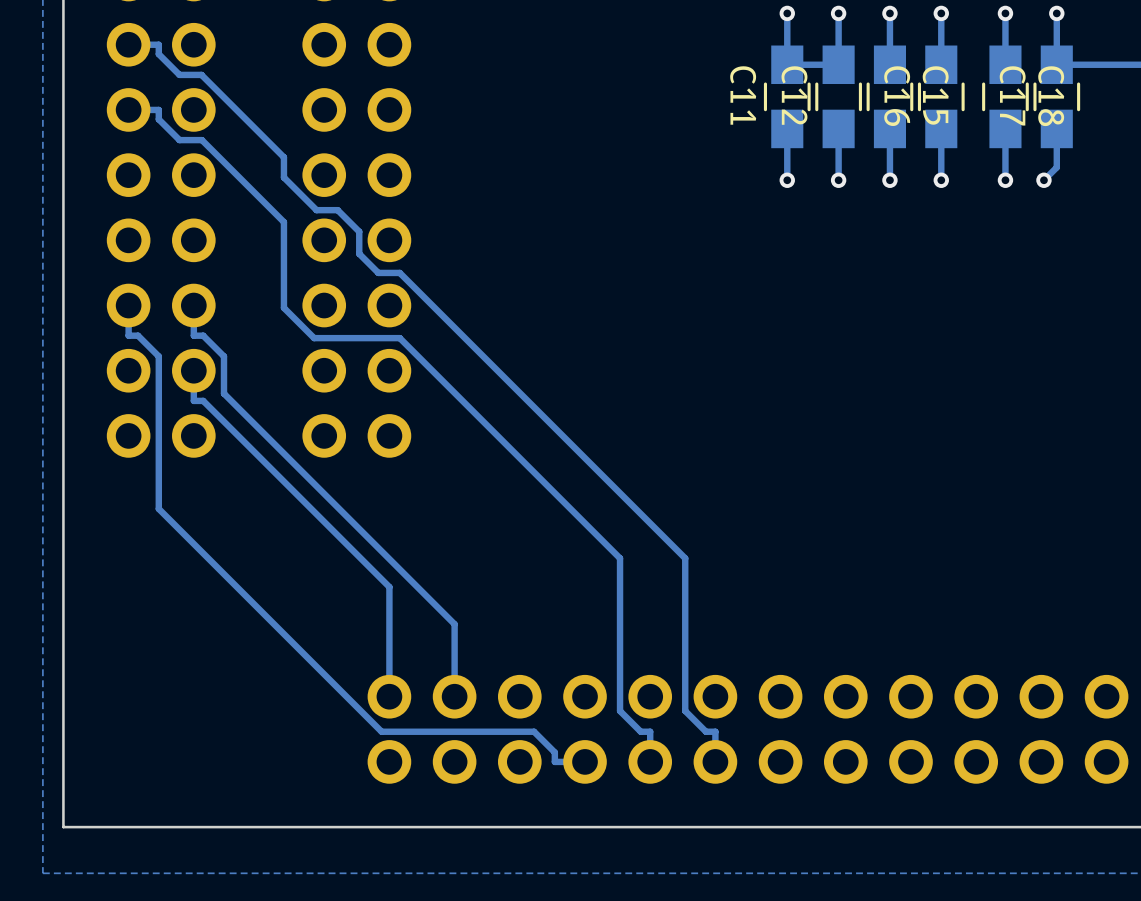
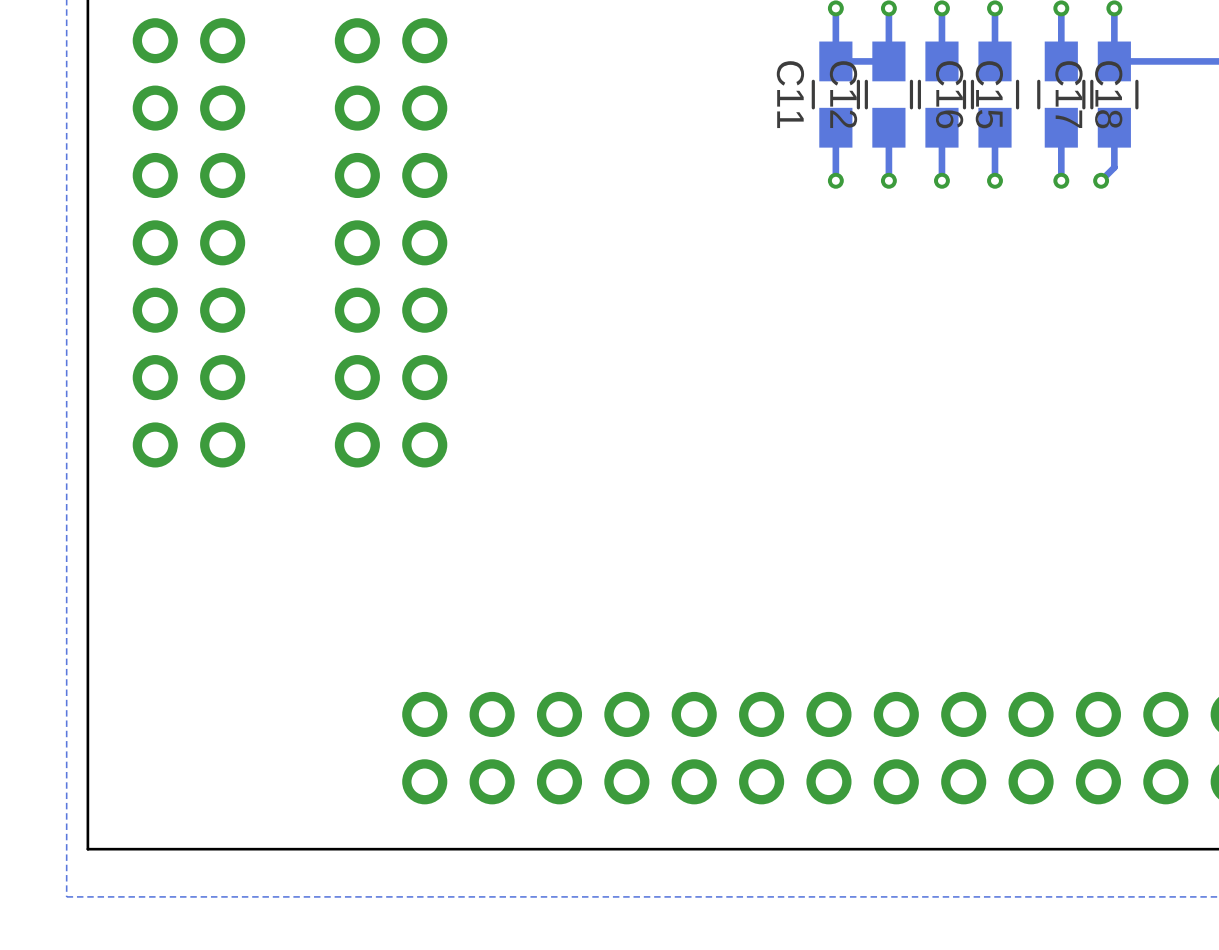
track: (128, 44) (158, 44) (158, 54) (179, 74) (201, 74) (283, 157) (283, 177) (316, 210) (337, 210) (359, 231) (359, 253) (378, 272) (399, 272) (685, 558) (685, 711) (705, 731) (715, 731) (715, 761) -> none
track: (128, 109) (158, 109) (158, 119) (179, 140) (201, 140) (283, 222) (283, 307) (314, 338) (399, 338) (620, 558) (620, 711) (640, 731) (650, 731) (650, 761) -> none
track: (128, 305) (128, 335) (138, 335) (158, 356) (158, 508) (381, 731) (534, 731) (554, 752) (554, 761) (585, 761) -> none
track: (193, 305) (193, 335) (203, 335) (223, 356) (223, 393) (454, 624) (454, 696) -> none
track: (193, 370) (193, 400) (203, 400) (389, 587) (389, 696) -> none

